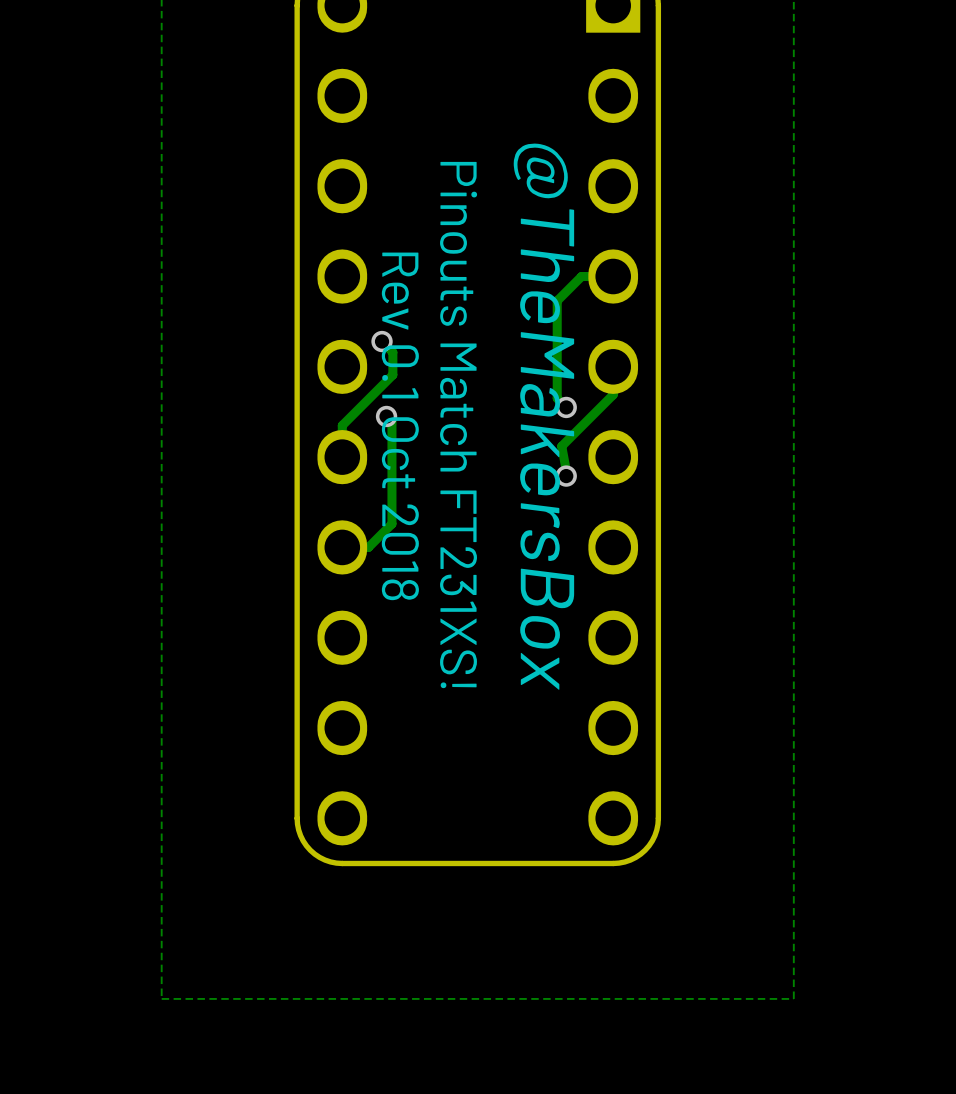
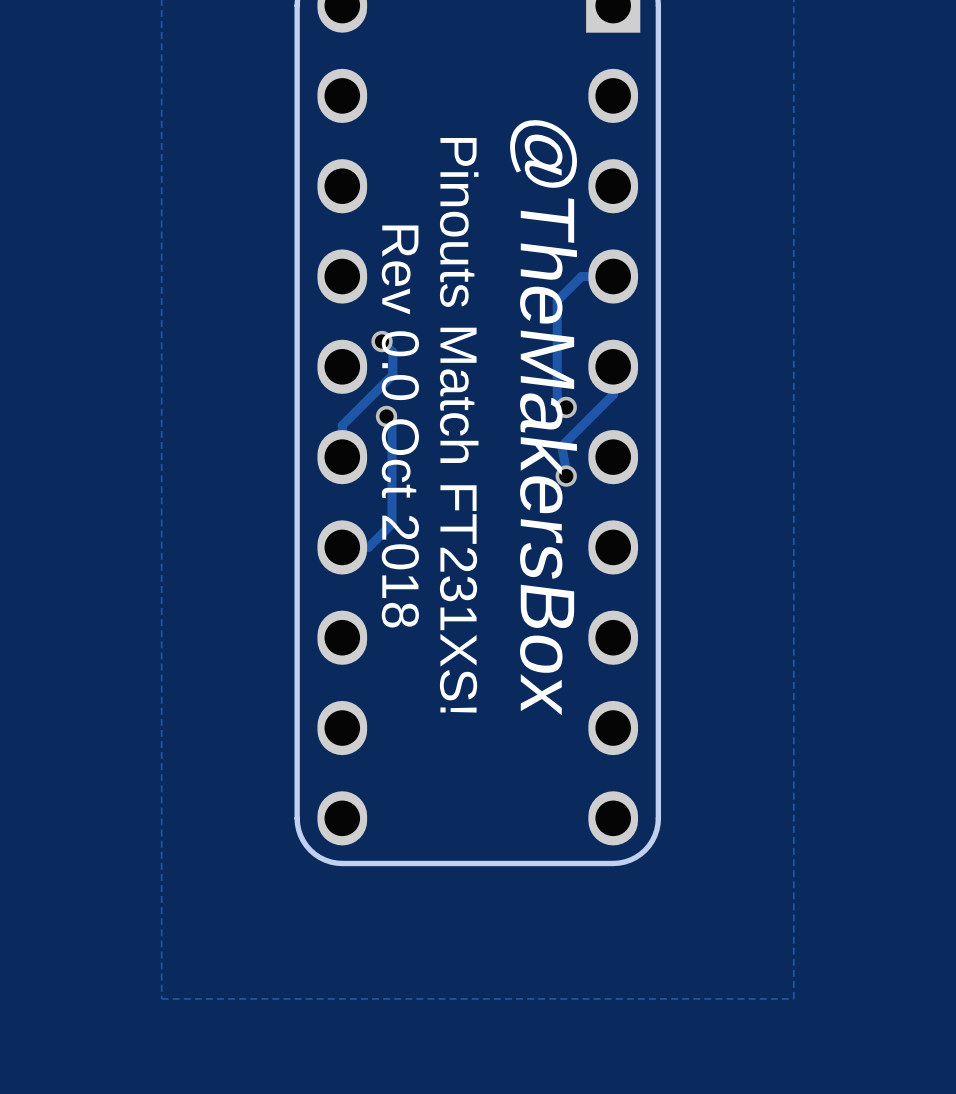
text: Rev 0.1 Oct 2018 (400, 426) -> Rev 0.0 Oct 2018 (400, 426)

